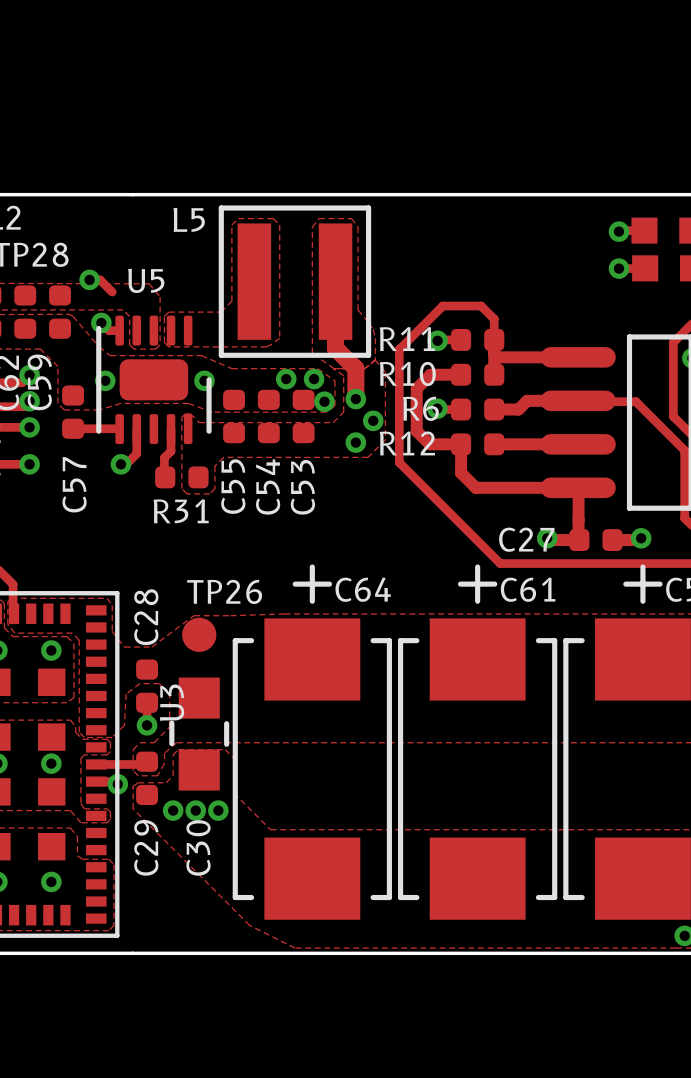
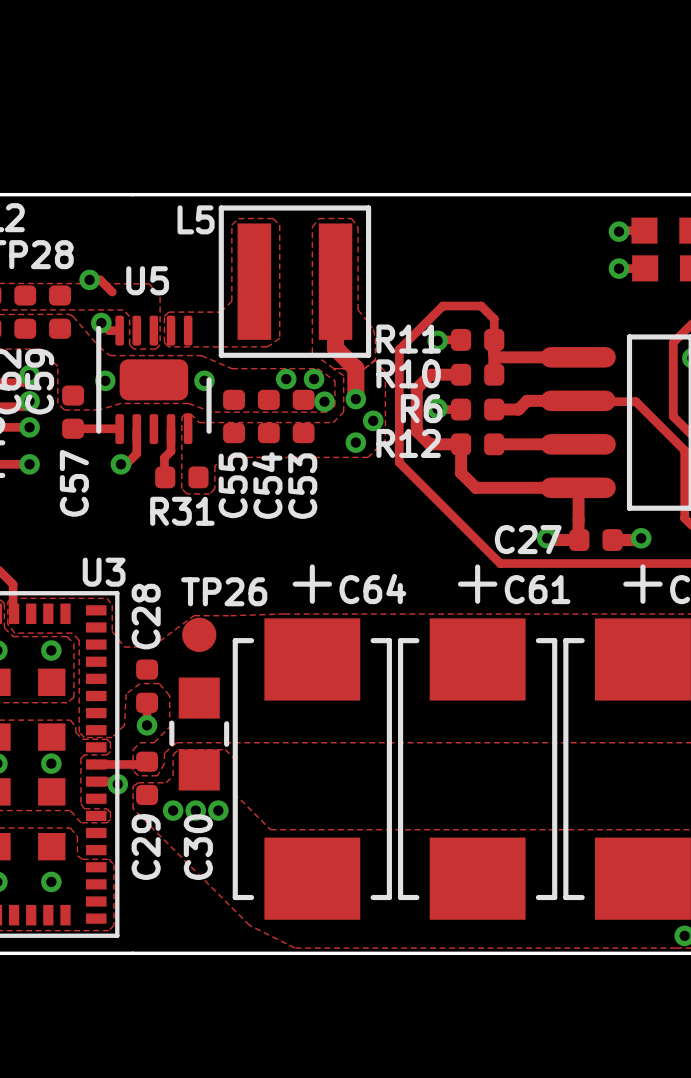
U3 name rotation: 0° (172, 702) -> 90° clockwise (104, 572)
U3 name position: U3 (172, 702) -> U3 (104, 572)

